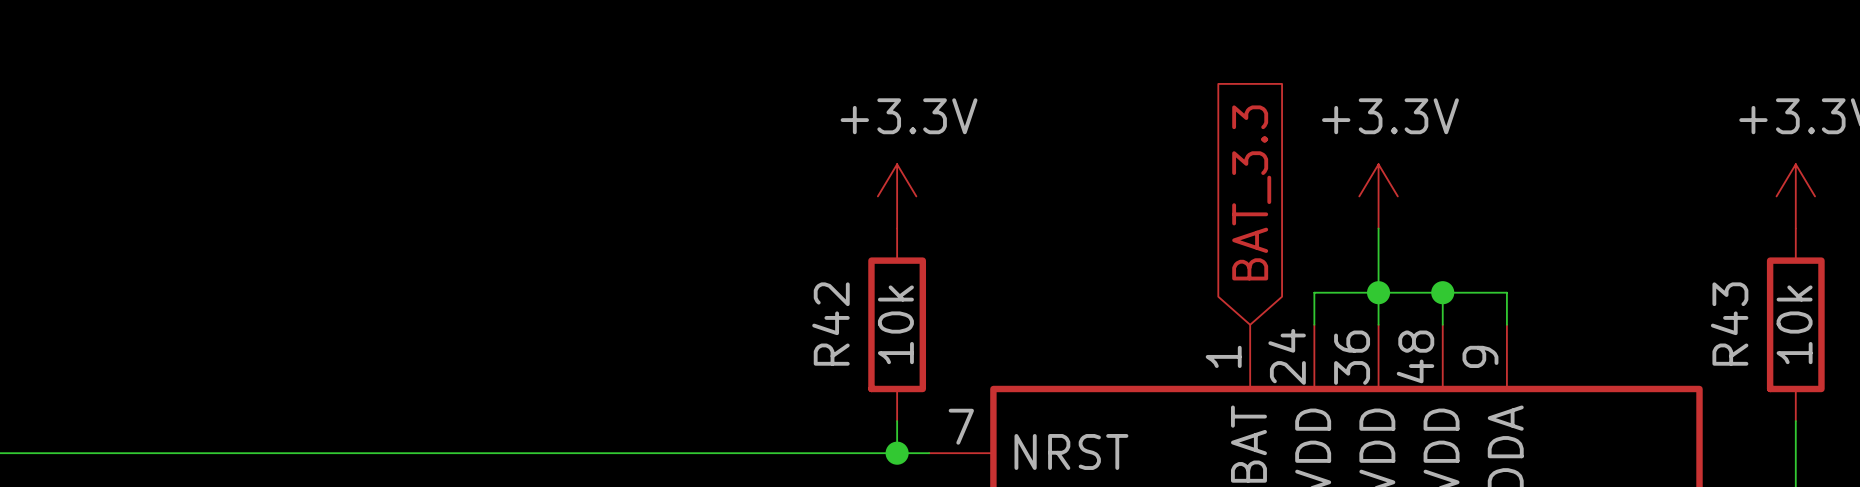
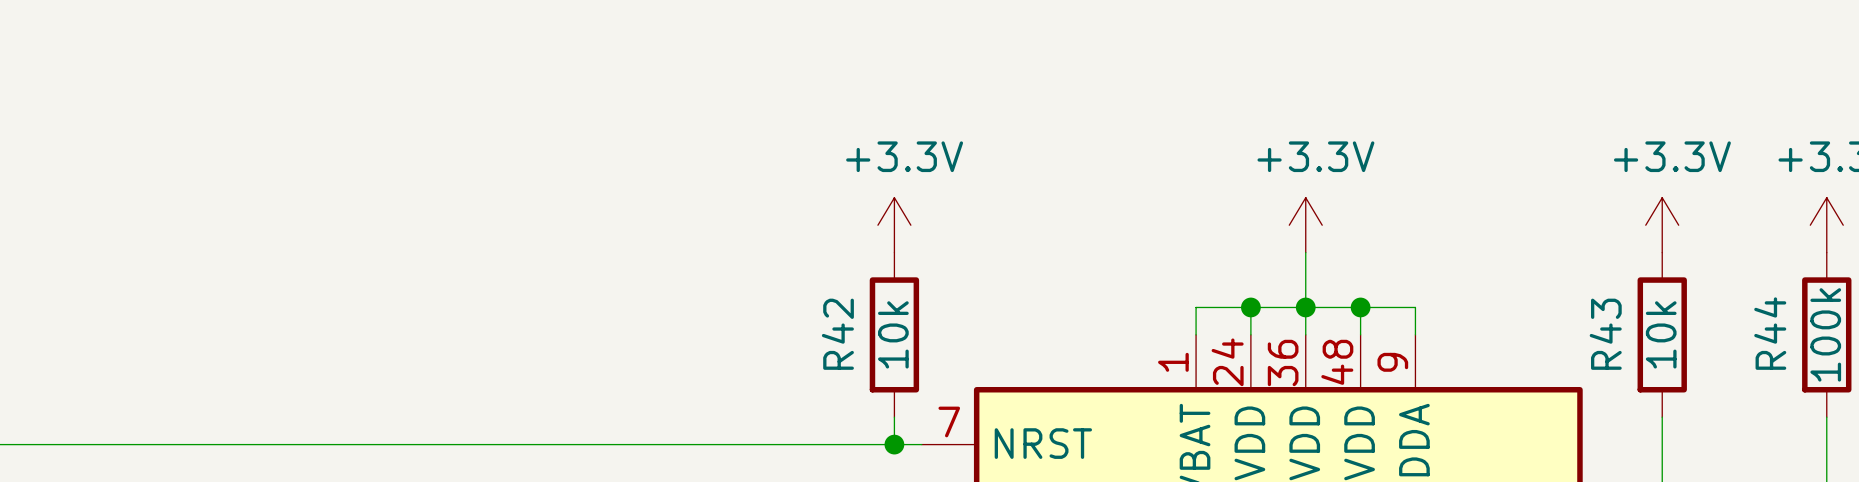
global label: BAT_3.3 (1251, 192) -> none
wire: none -> (1250, 307) (1196, 307) (1196, 334)
junction: none -> (1250, 307)

